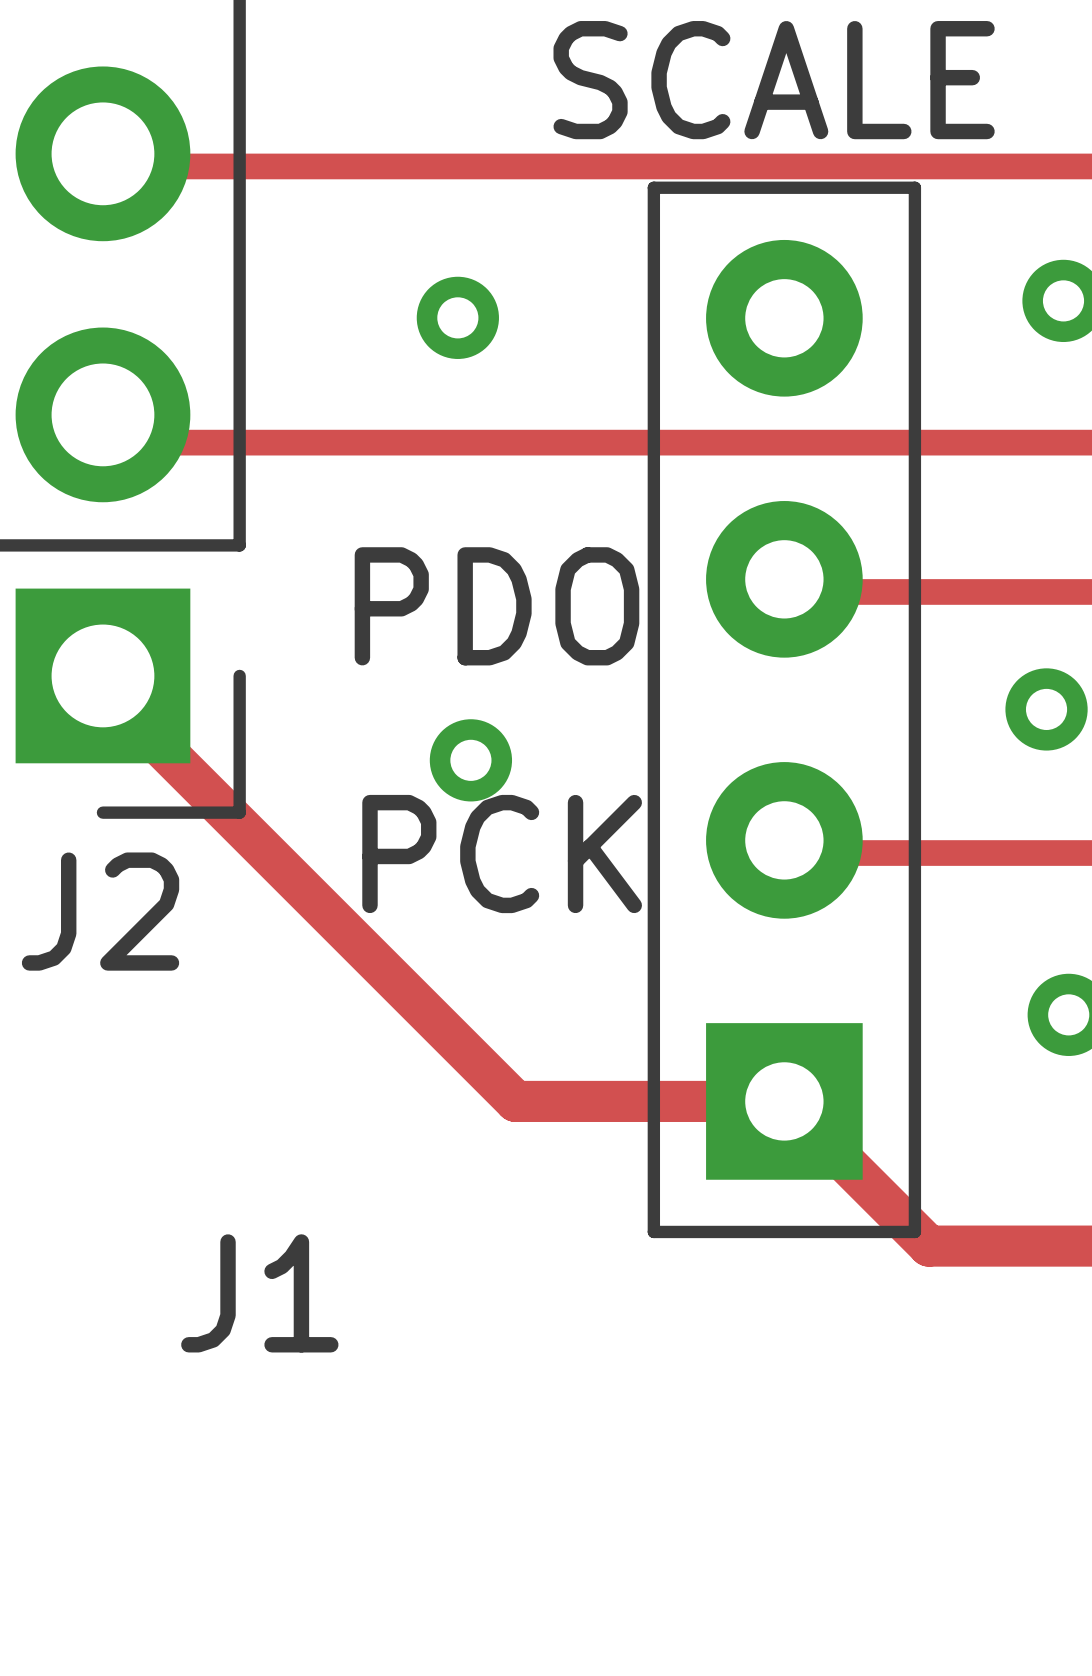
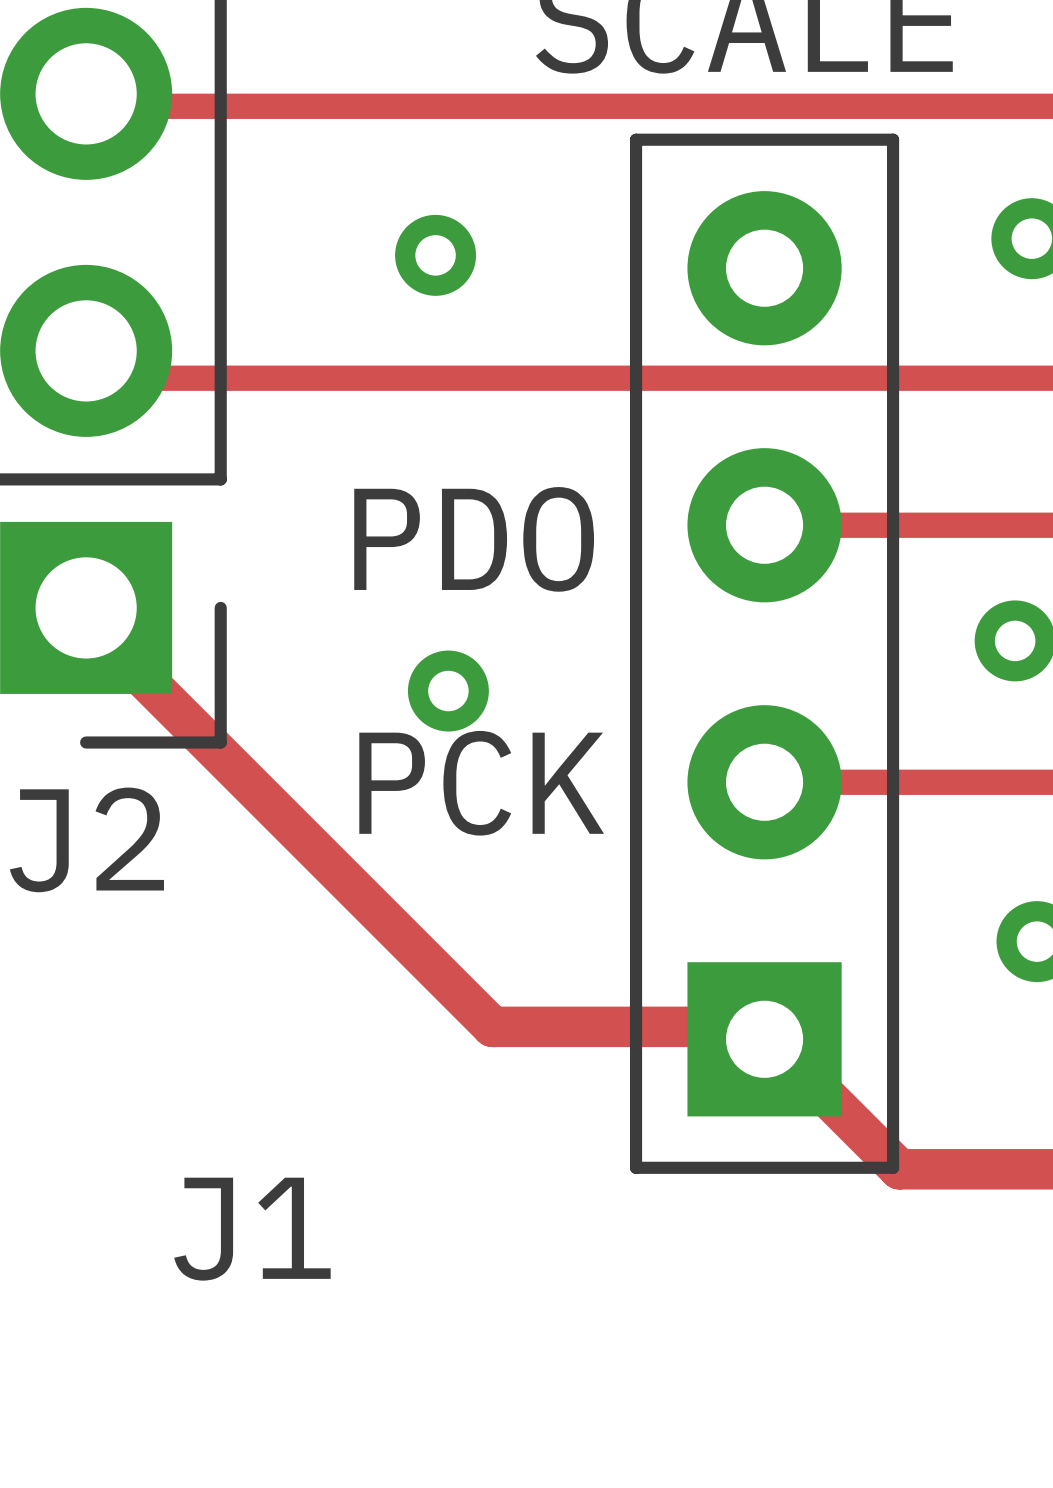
J1 position: (784, 709) -> (764, 653)

